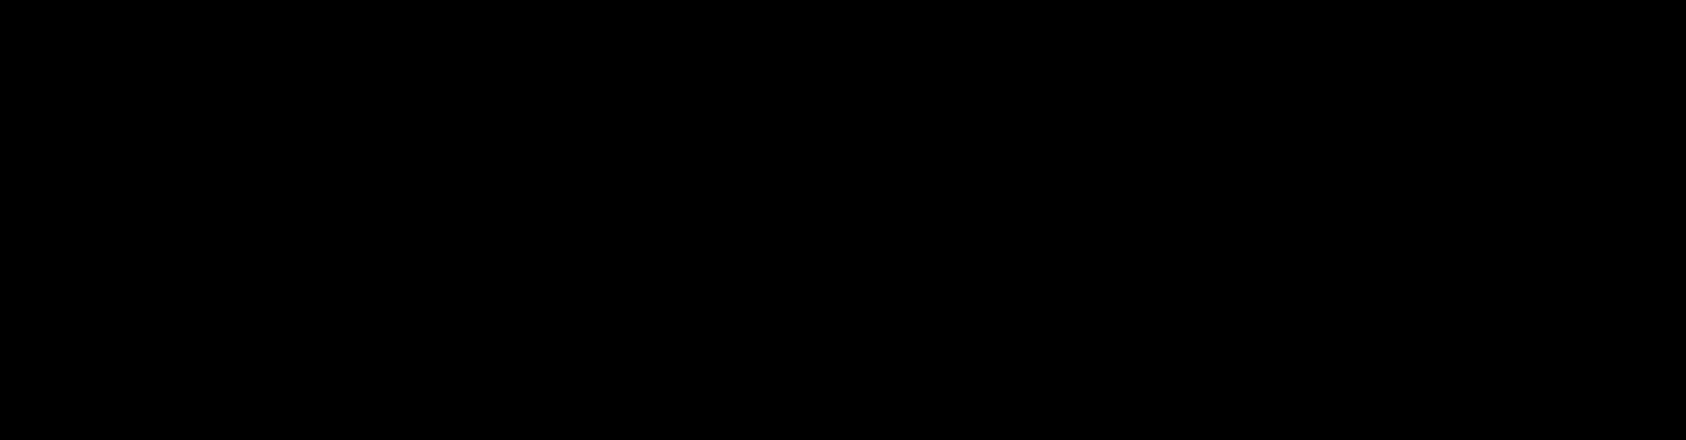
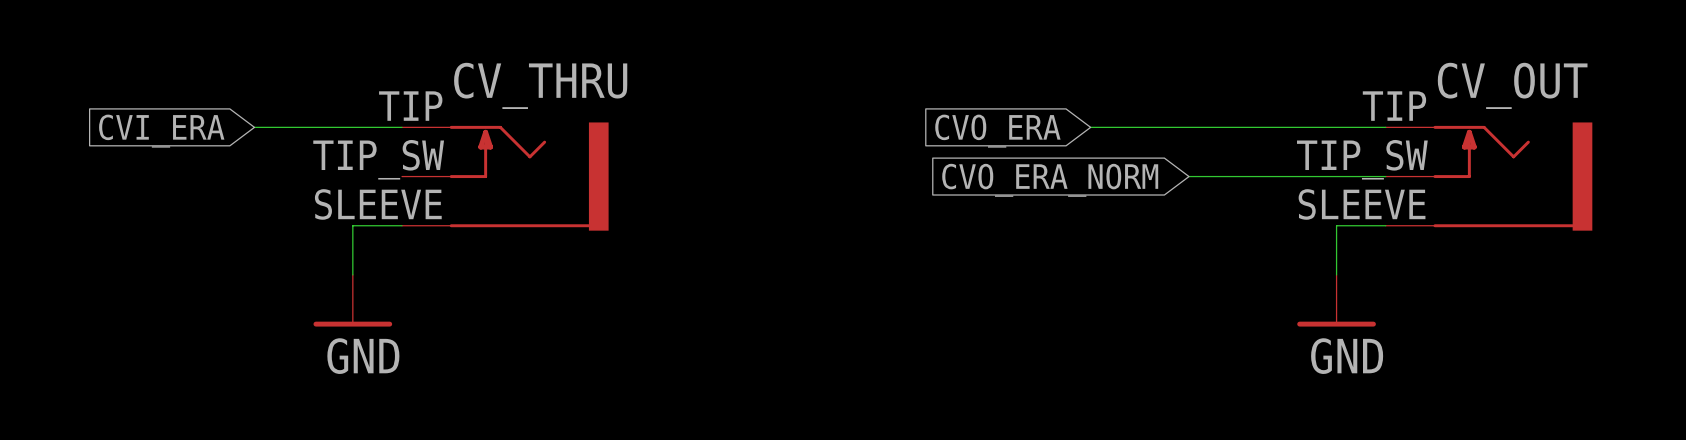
wire: none -> (254, 127) (402, 127)
wire: none -> (1090, 127) (1385, 127)
global label: none -> CVI_ERA (161, 131)
global label: none -> CVO_ERA (997, 131)
CV_THRU: none -> (505, 176)
wire: none -> (1189, 176) (1385, 176)
CV_OUT: none -> (1489, 176)
global label: none -> CVO_ERA_NORM (1050, 180)
wire: none -> (402, 225) (352, 225) (352, 274)
wire: none -> (1385, 225) (1336, 225) (1336, 274)
power symbol: none -> GND (352, 300)
power symbol: none -> GND (1336, 300)

